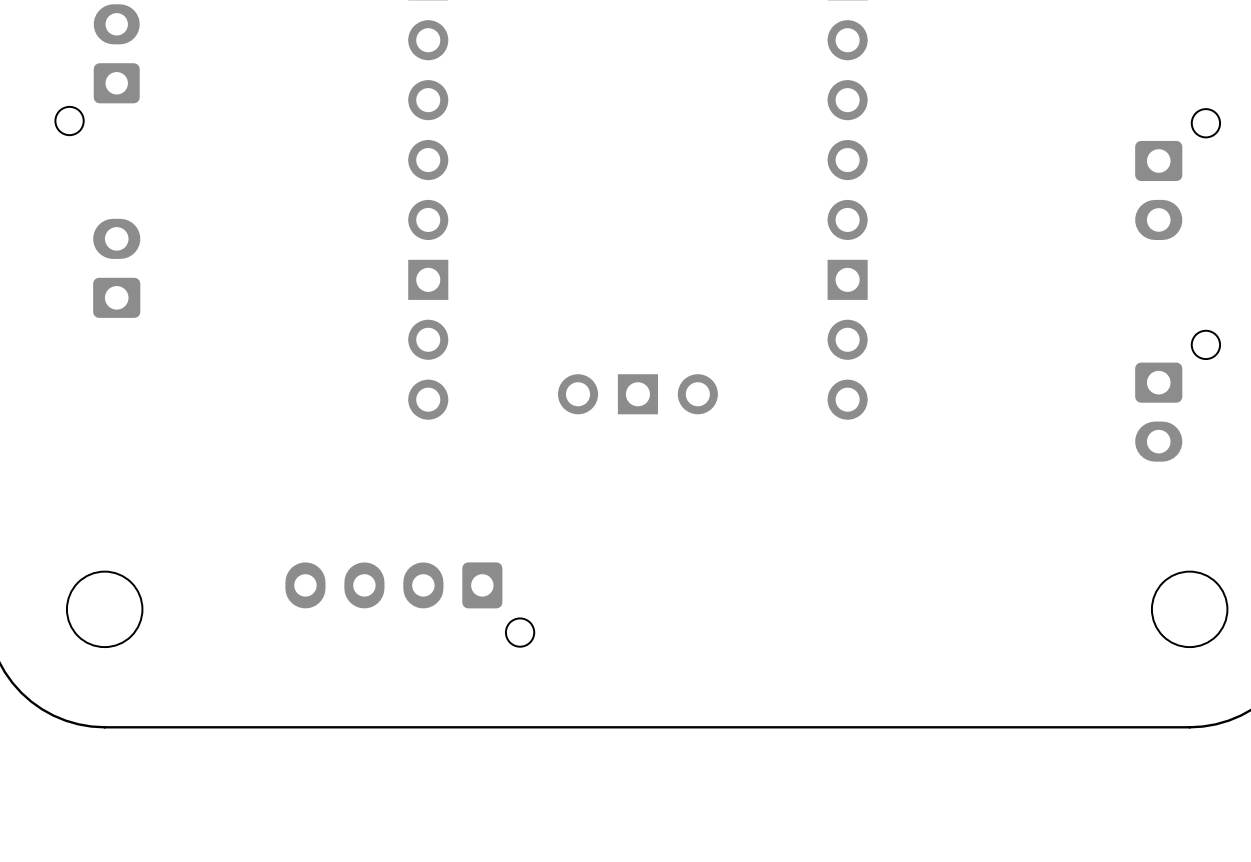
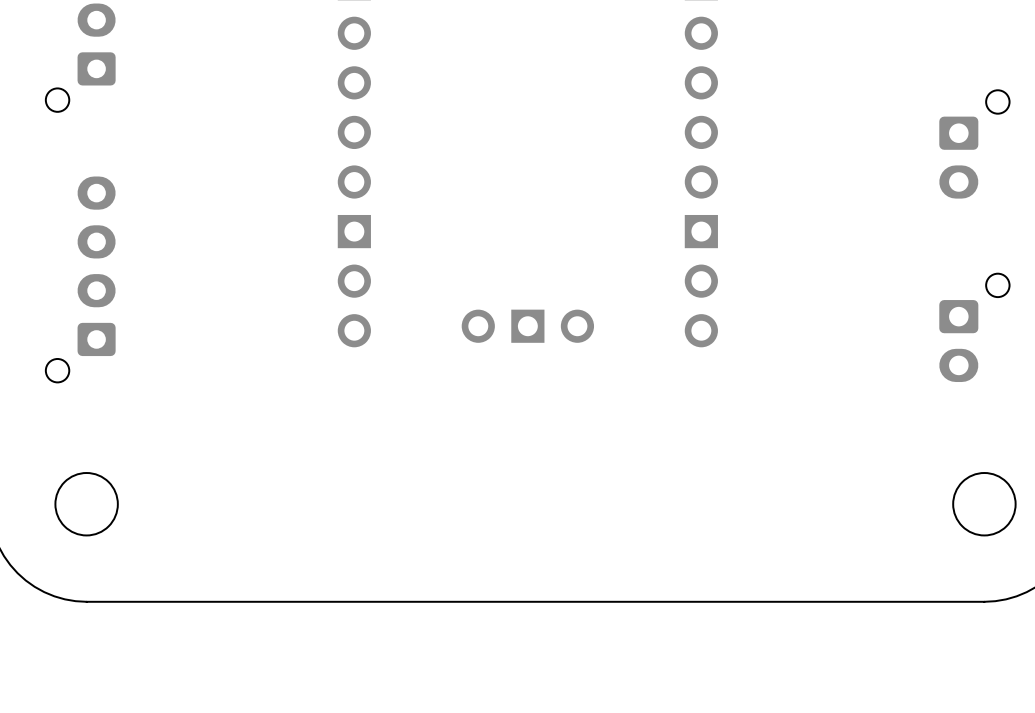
part: (116, 268) -> none
part rotation: 0° (409, 604) -> 90° clockwise (80, 279)
part position: (409, 604) -> (80, 279)

